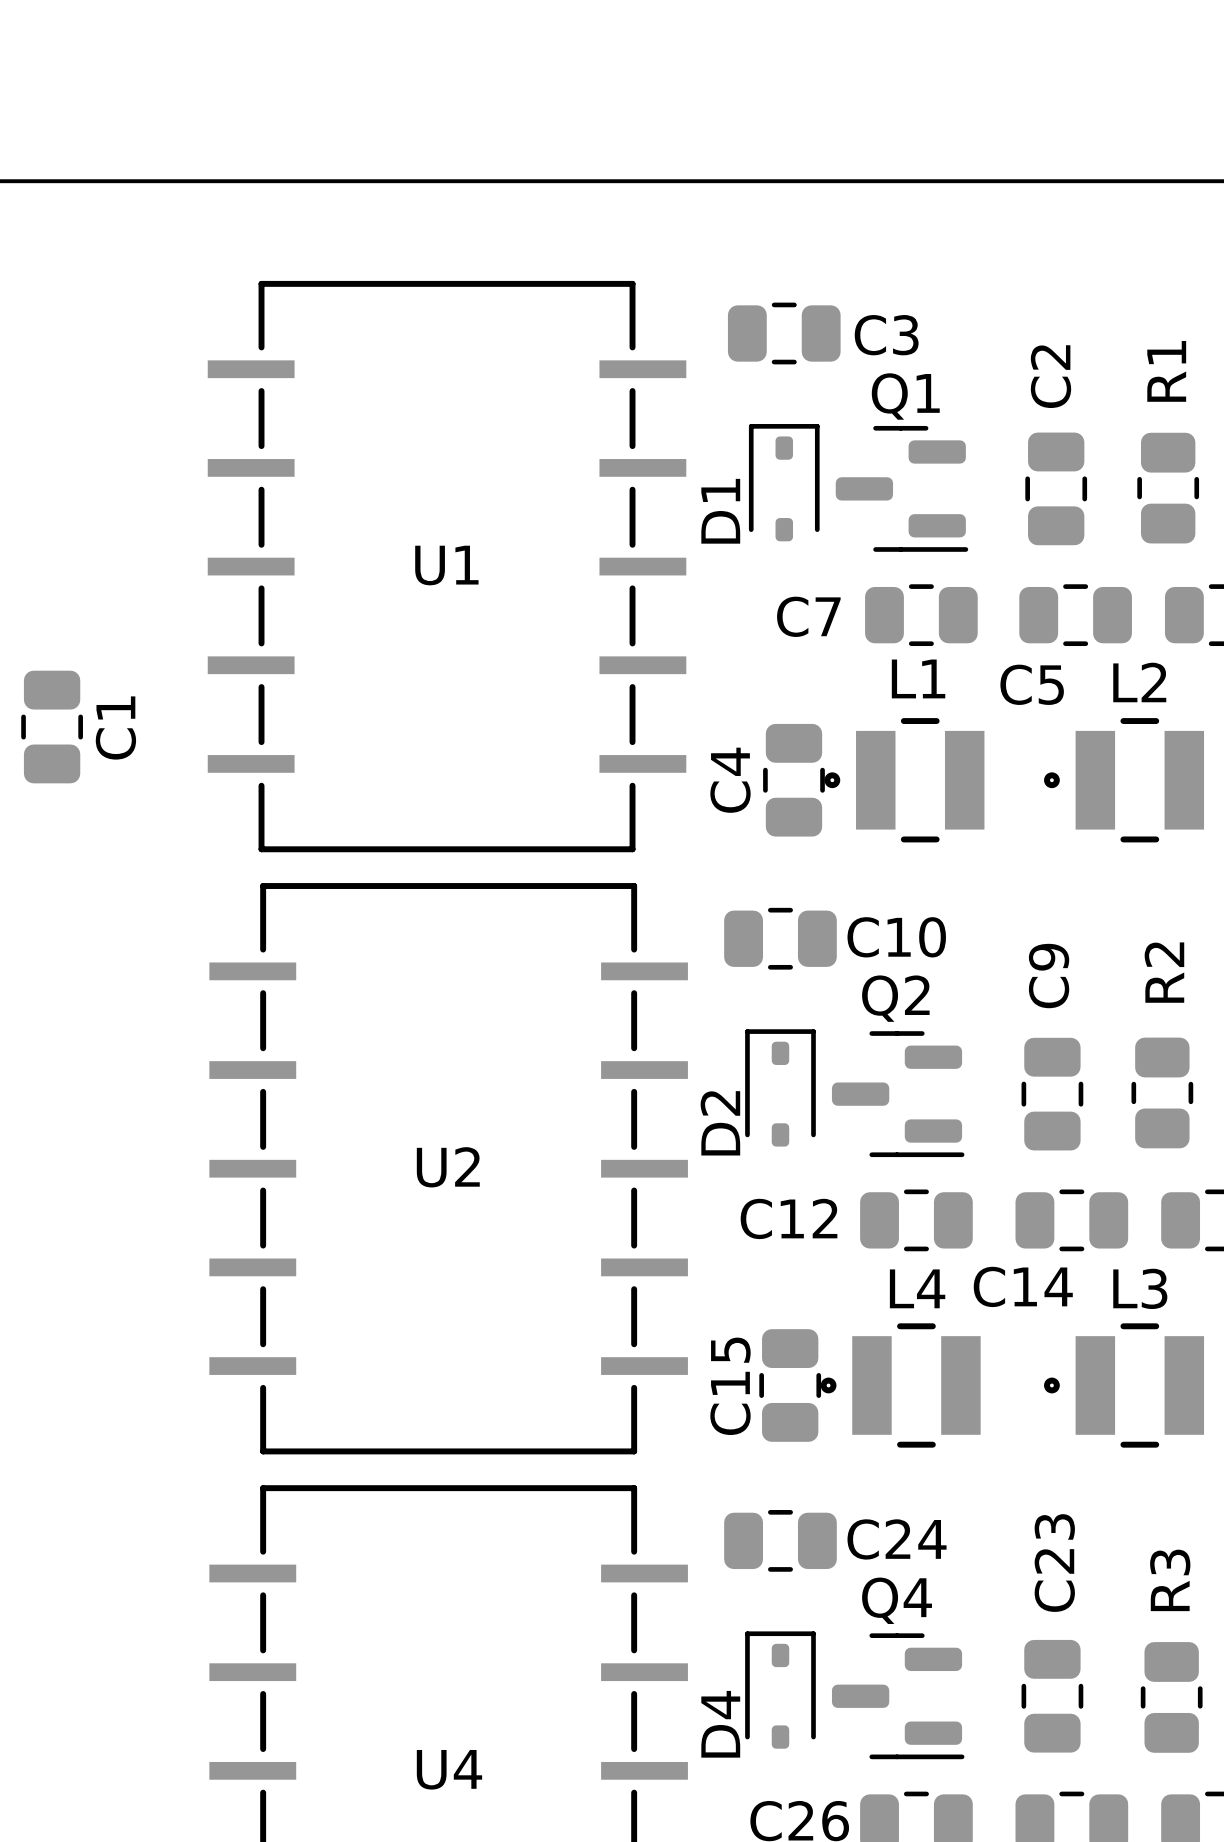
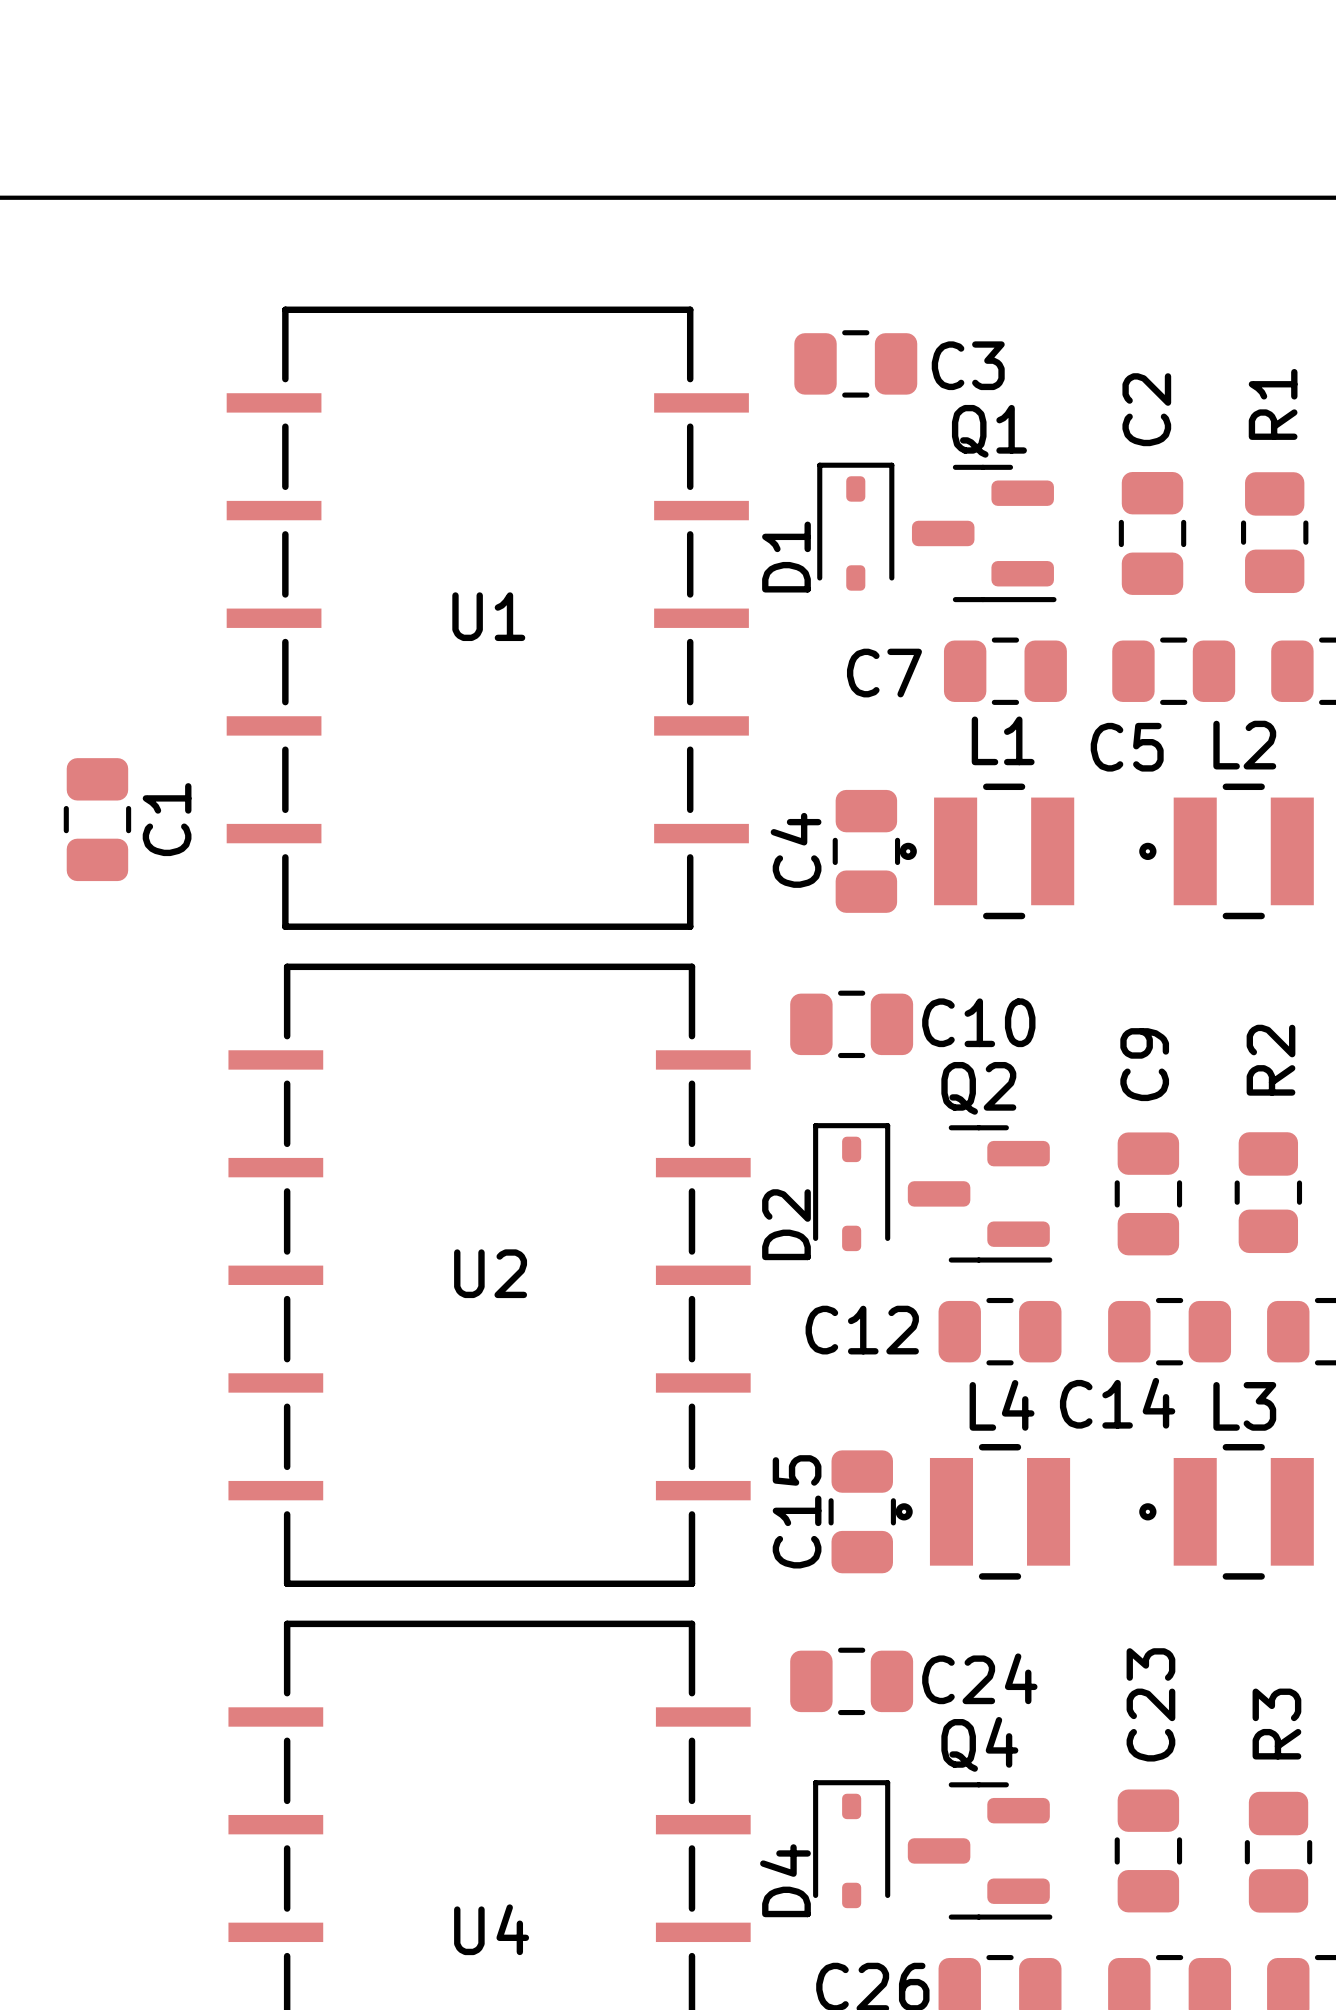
C1 position: (52, 727) -> (97, 819)

